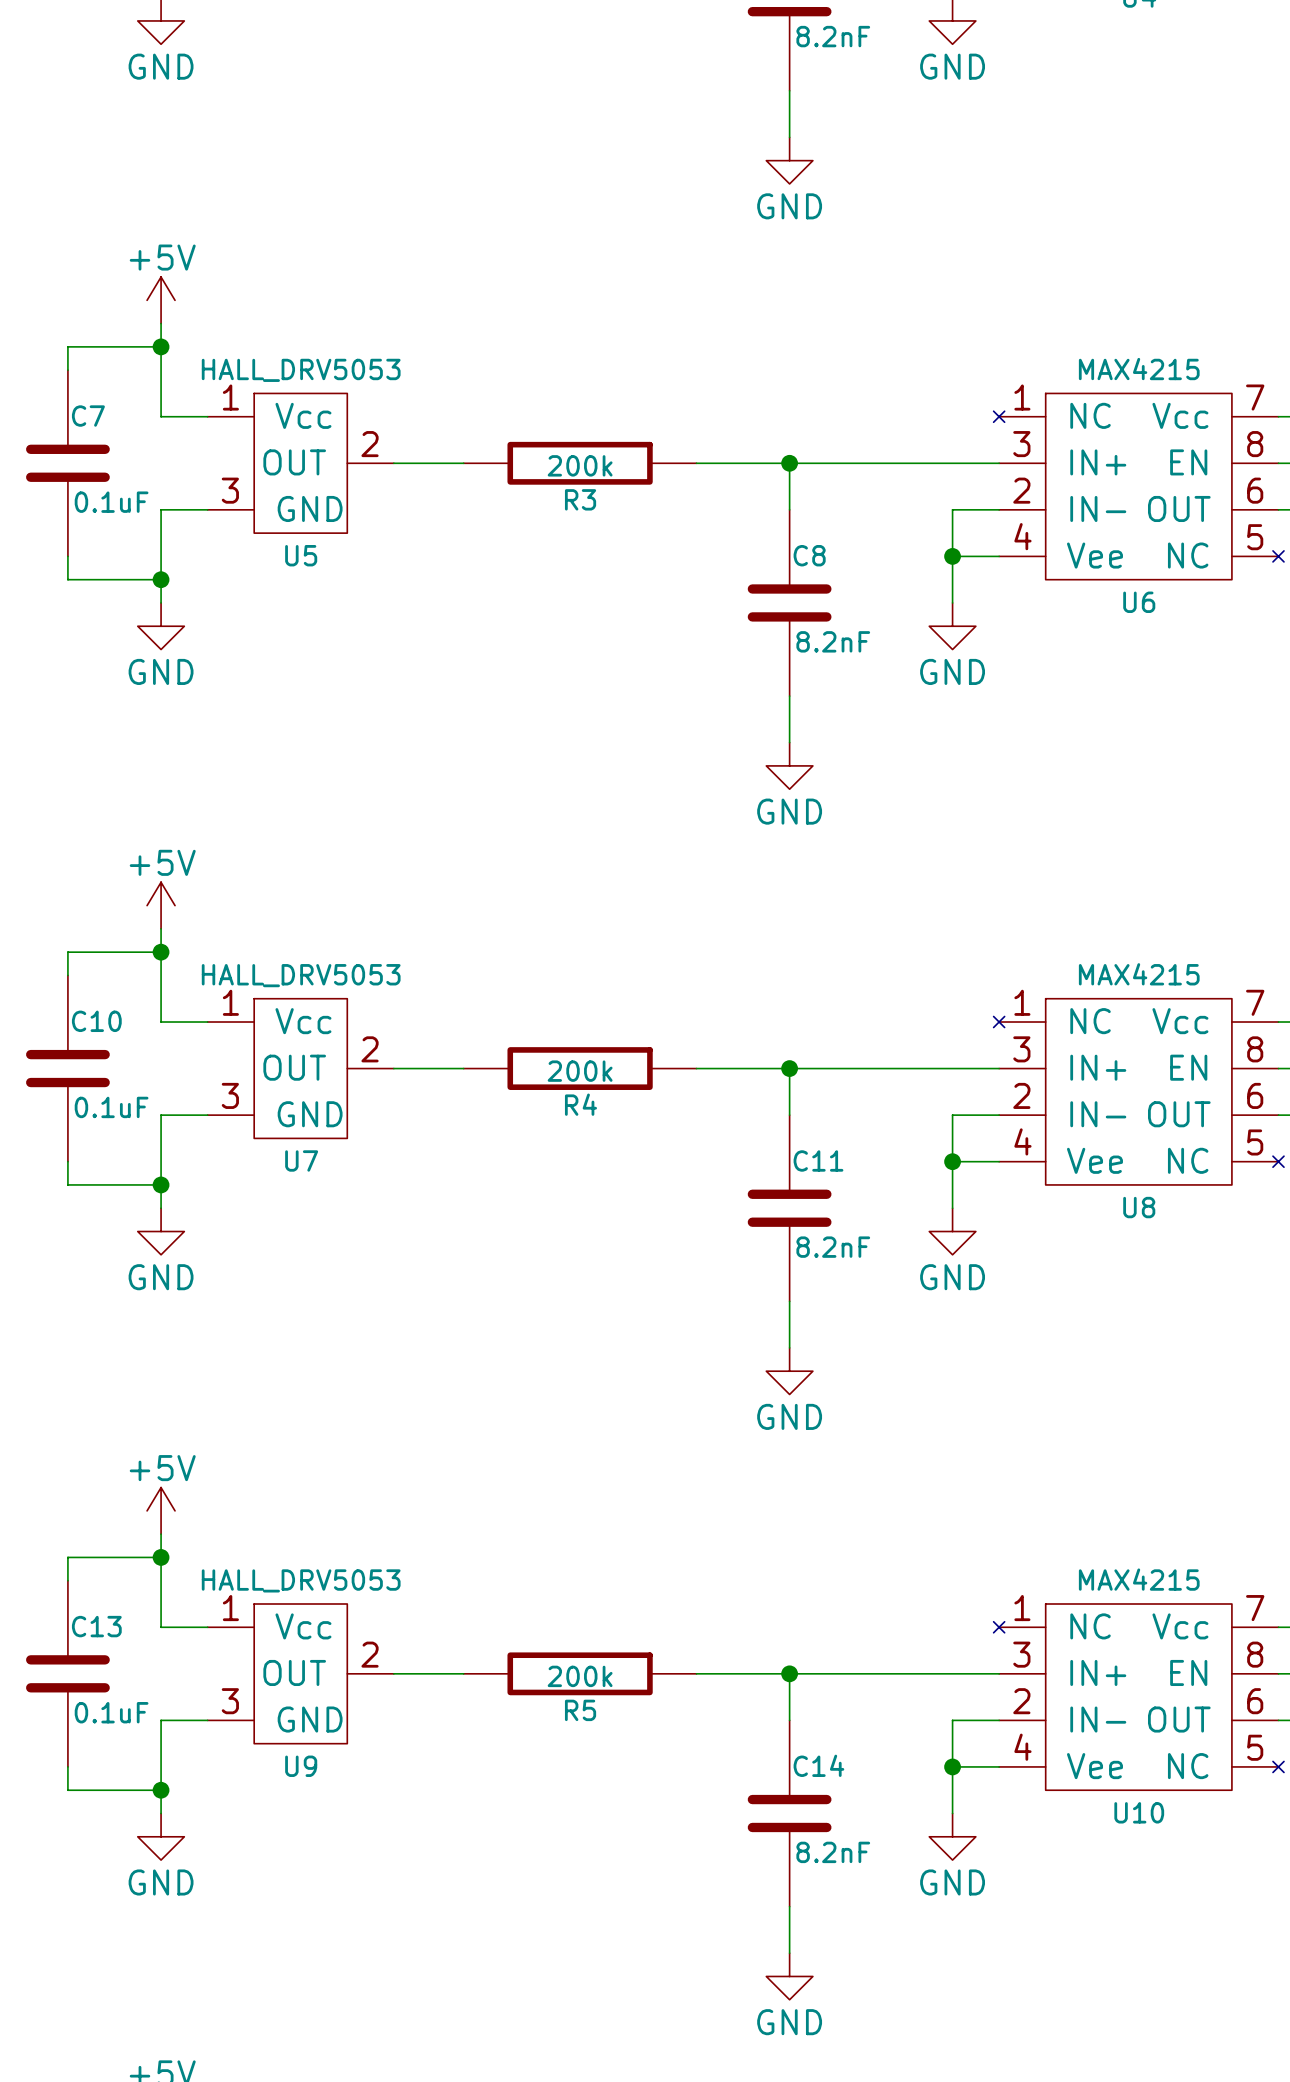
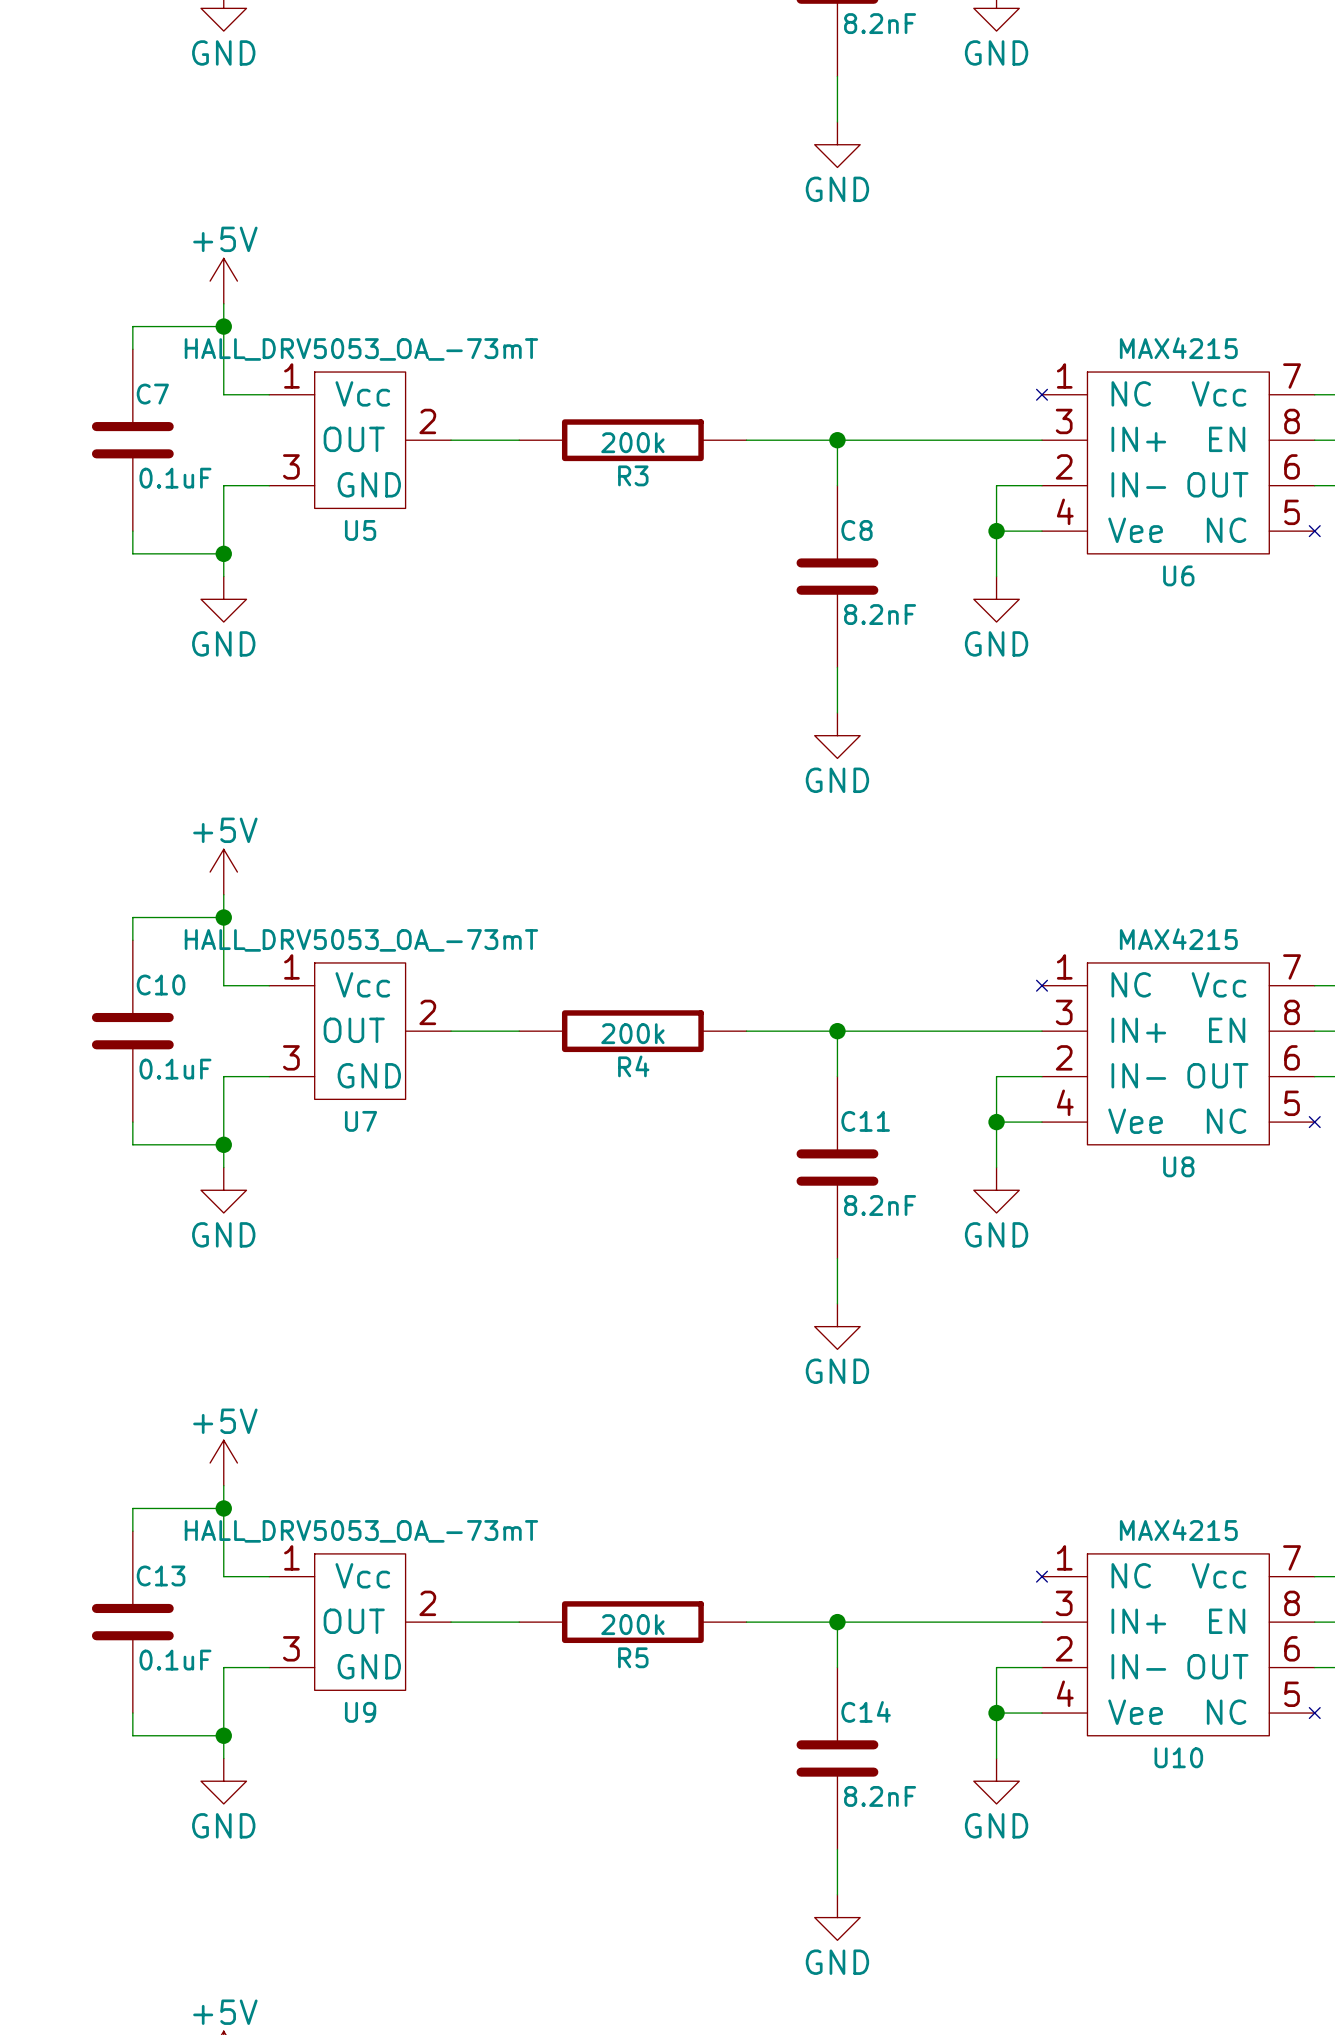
U5 value: HALL_DRV5053 (301, 370) -> HALL_DRV5053_OA_-73mT (361, 349)
U7 value: HALL_DRV5053 (301, 975) -> HALL_DRV5053_OA_-73mT (361, 940)
U9 value: HALL_DRV5053 (301, 1580) -> HALL_DRV5053_OA_-73mT (361, 1531)

